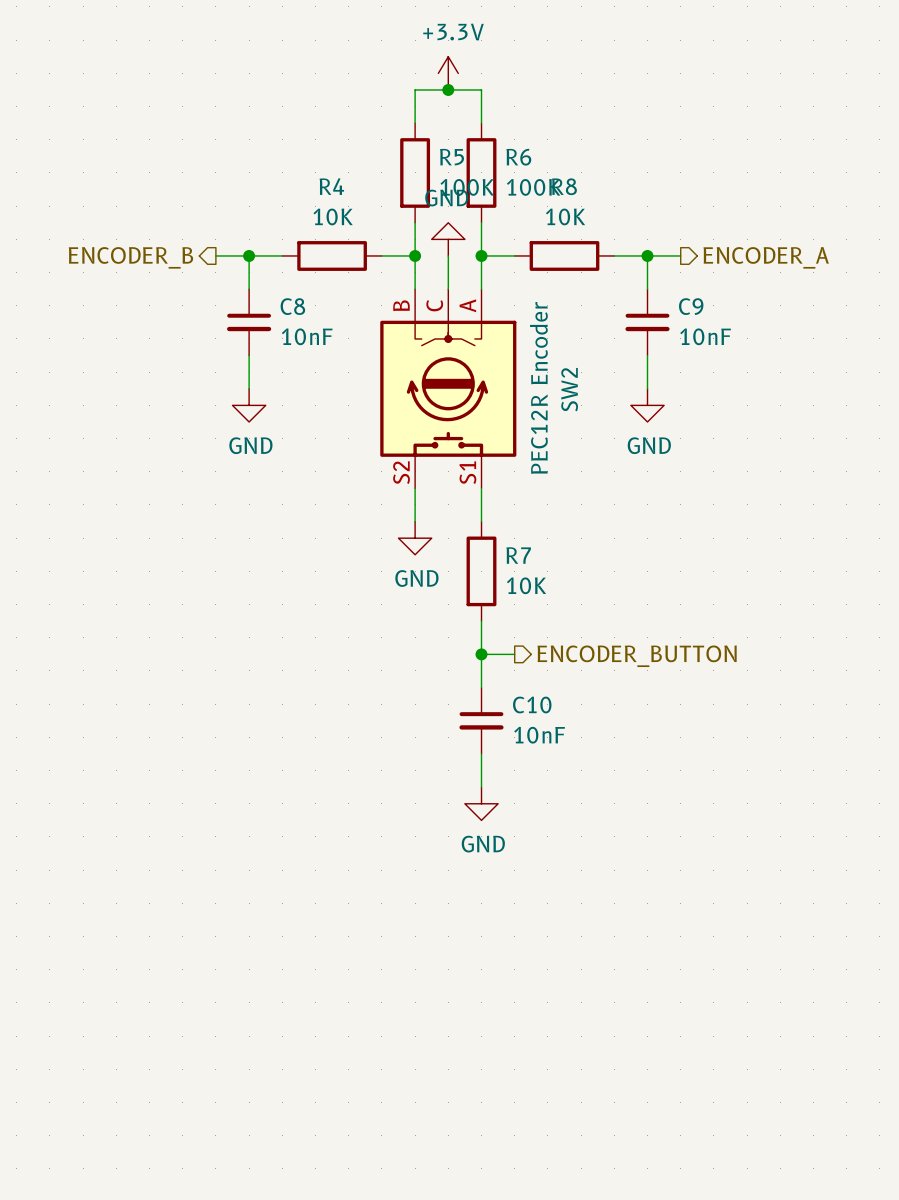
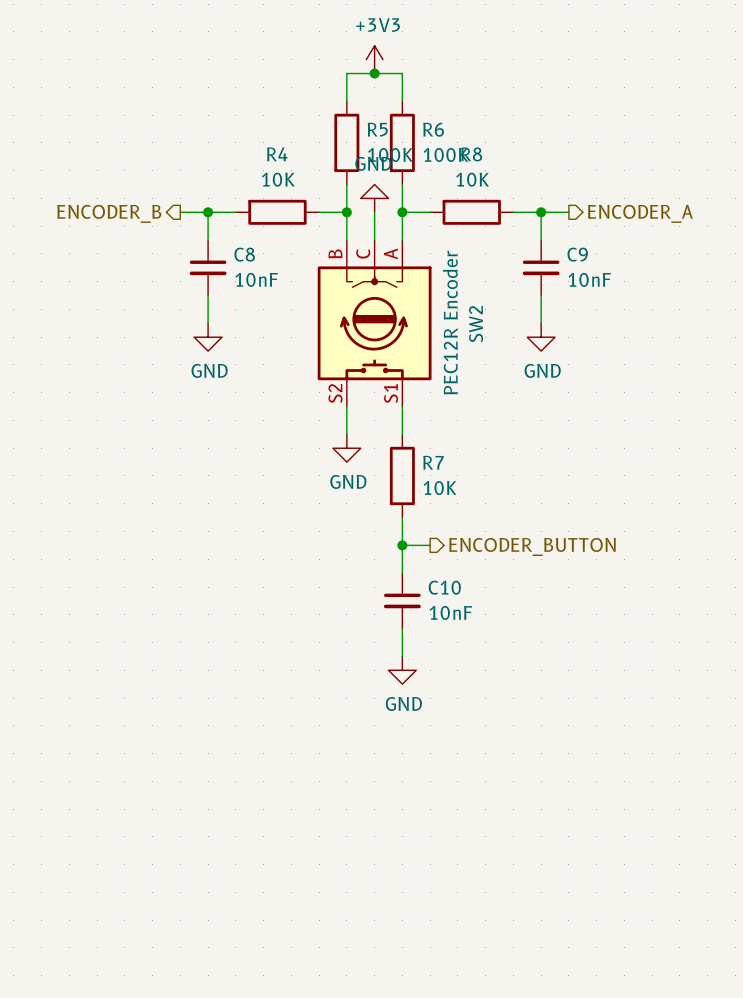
power symbol: +3.3V (448, 73) -> +3V3 (374, 59)

